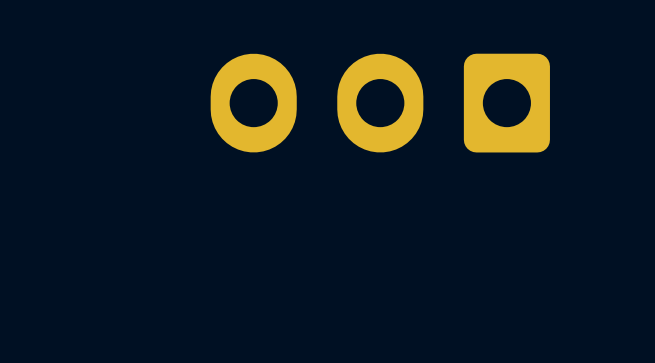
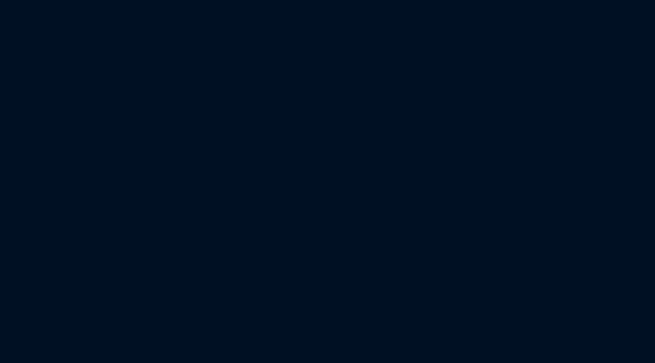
part: (380, 103) -> none

